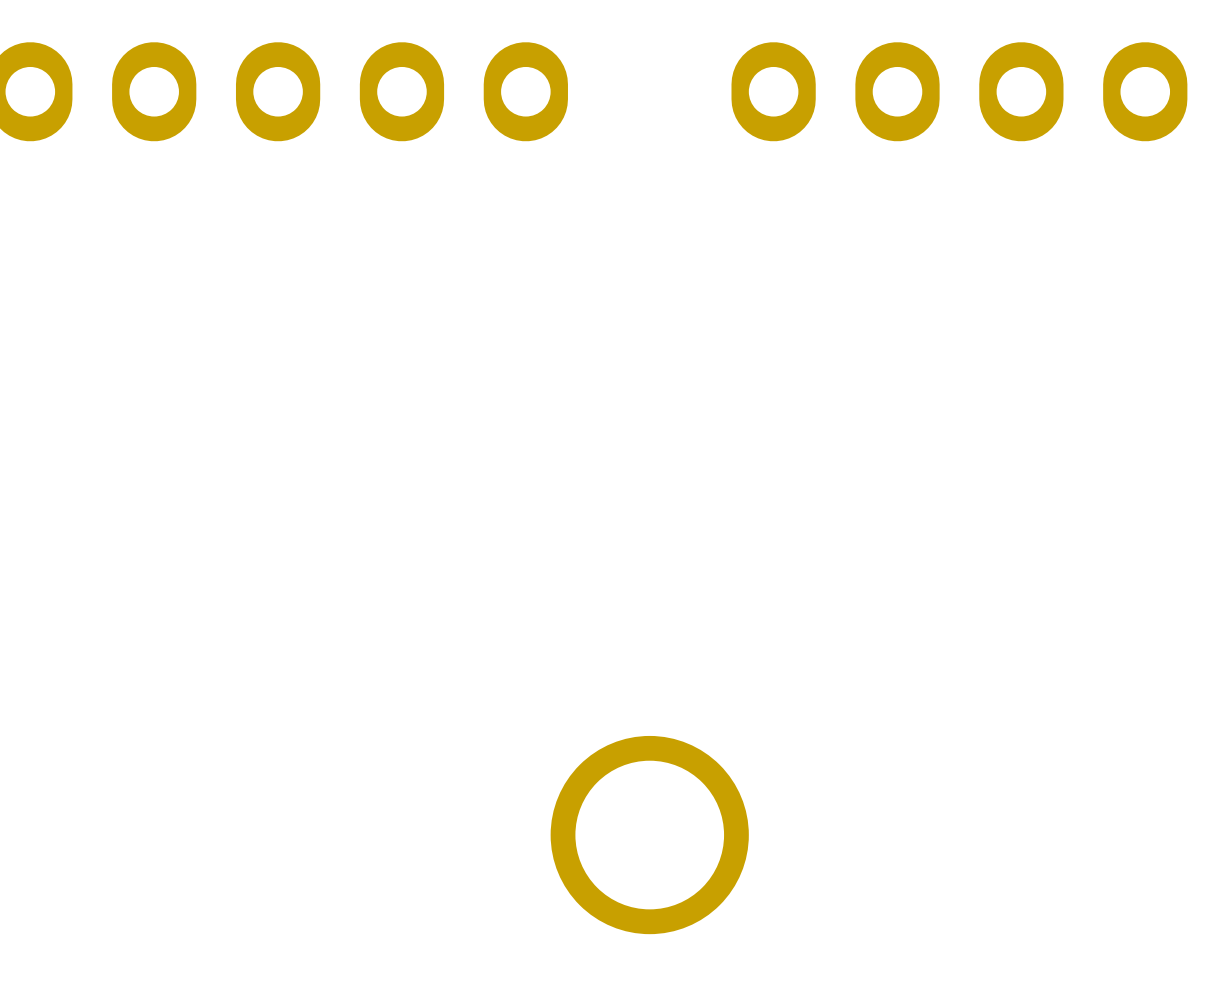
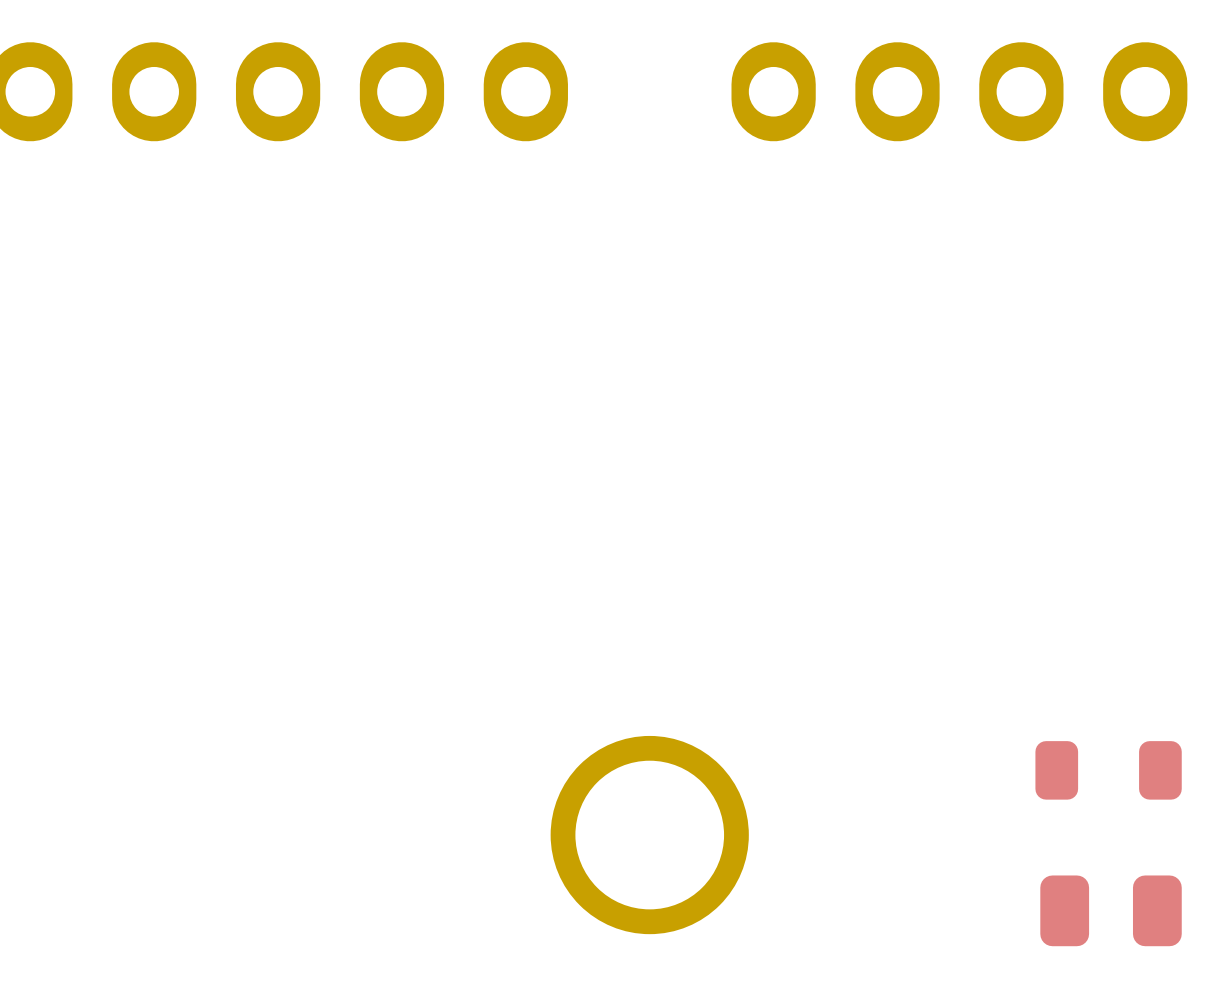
part: none -> (1108, 770)
part: none -> (1111, 910)

